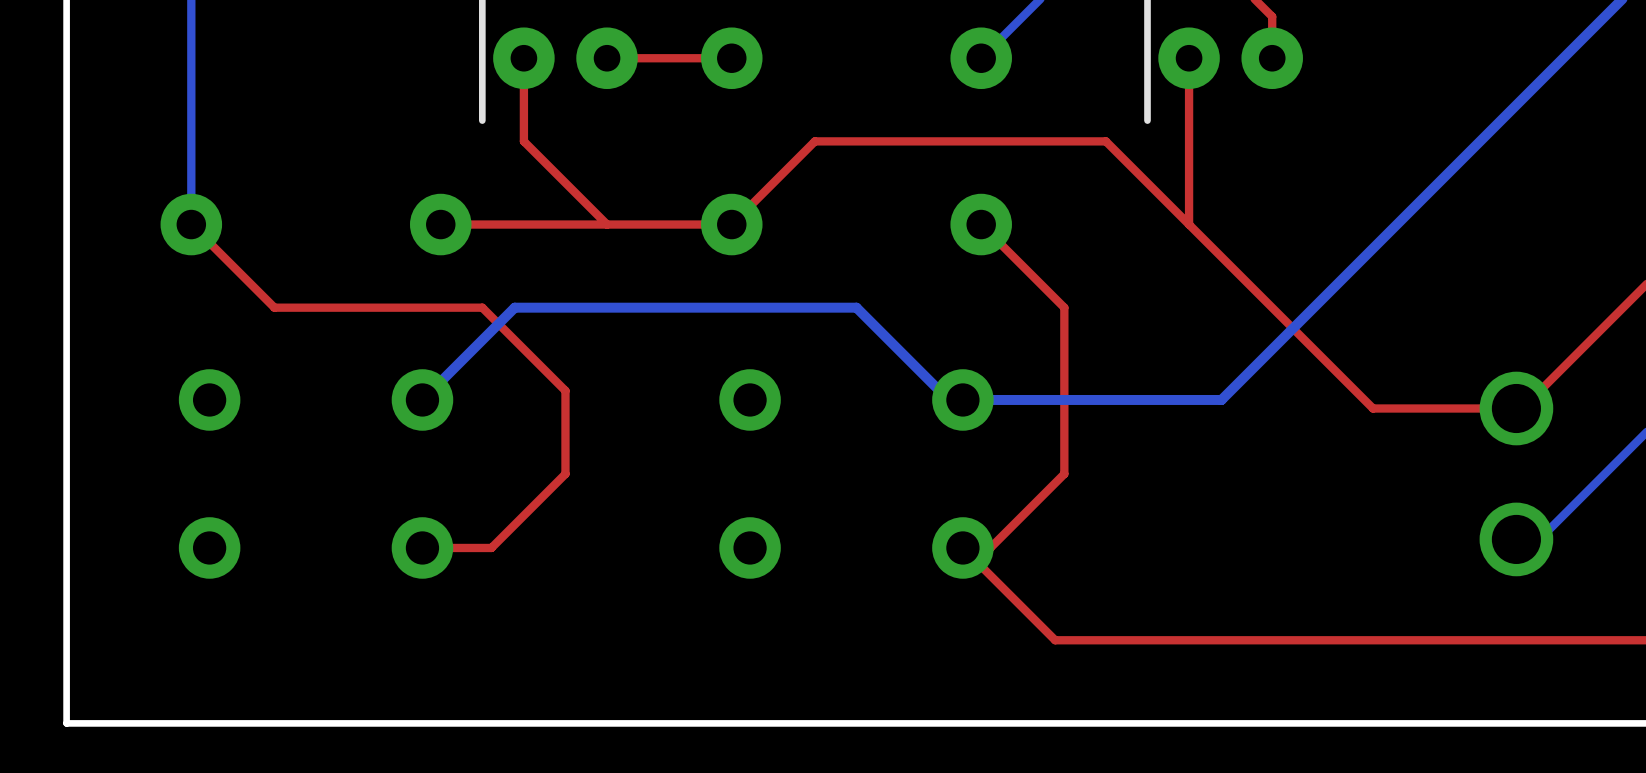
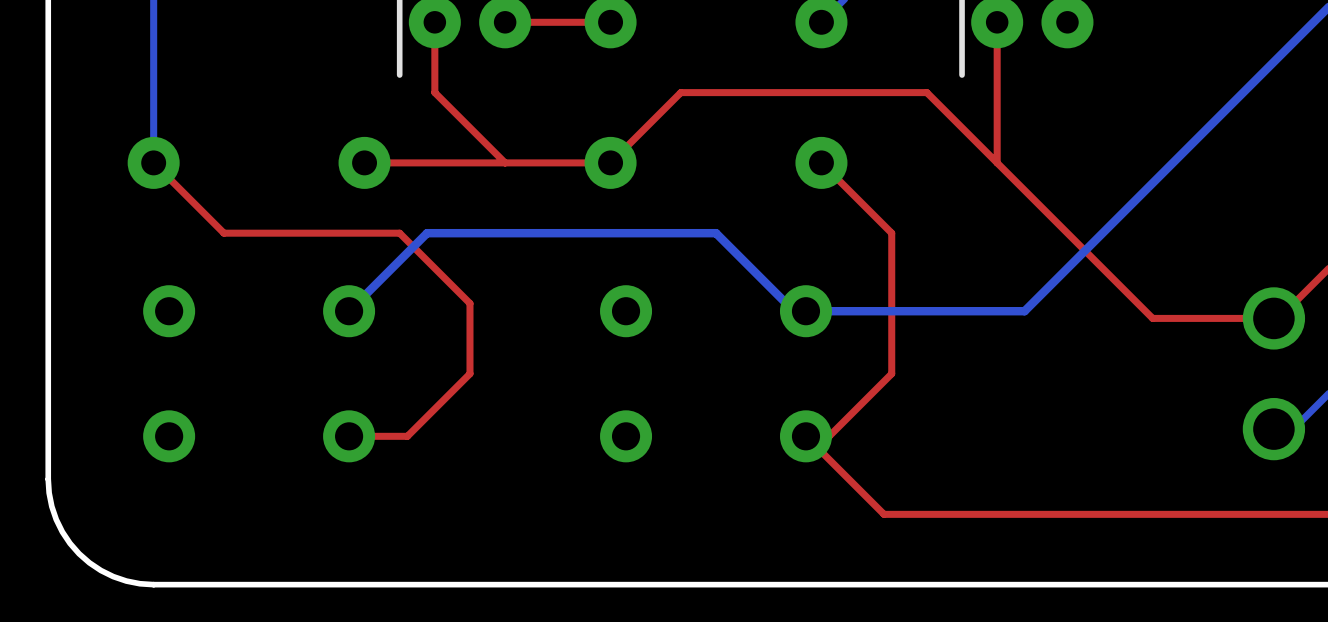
board edge: (66, 598) (66, 723) (191, 723) -> (48, 479) (51, 506) (56, 519) (62, 531) (79, 553) (100, 570) (113, 576) (126, 581) (153, 584)

